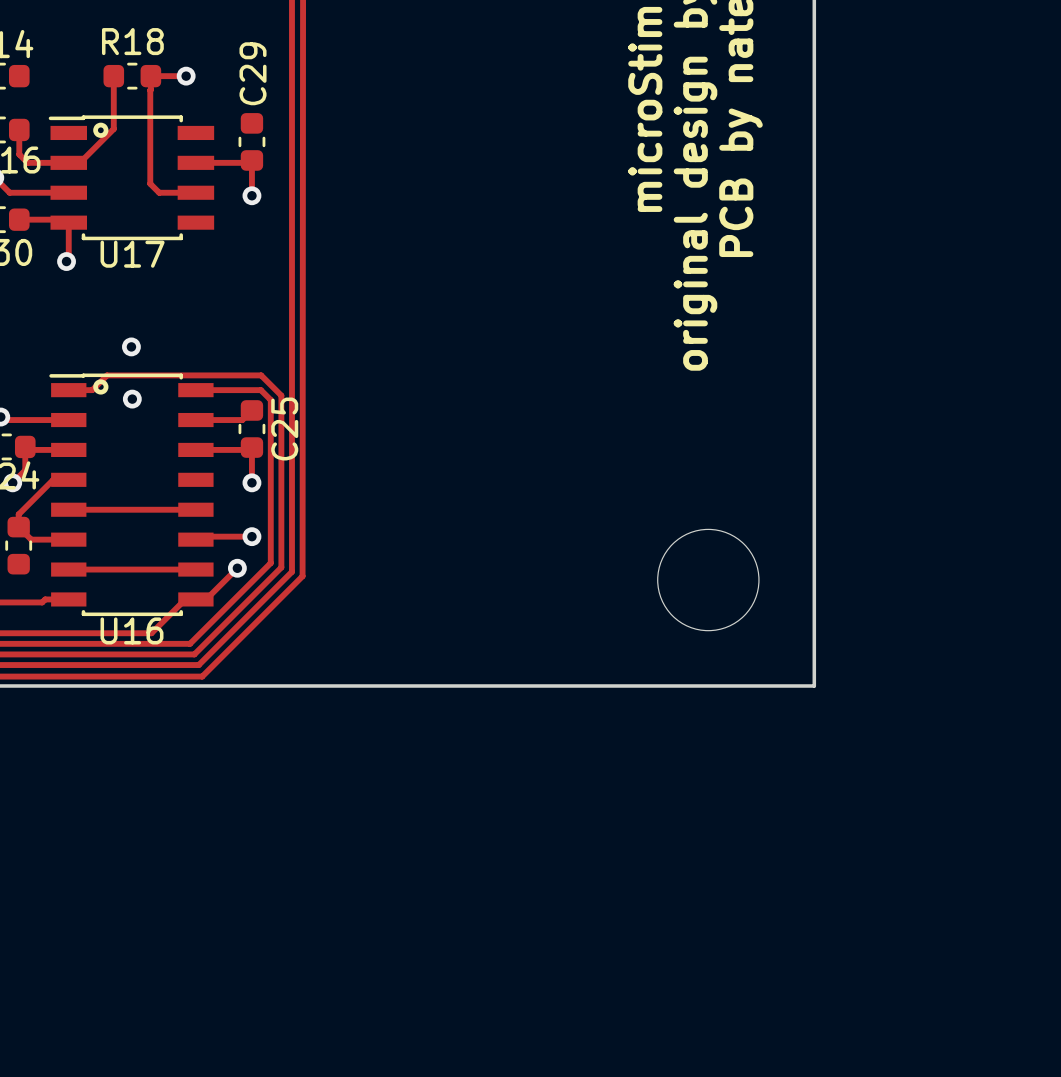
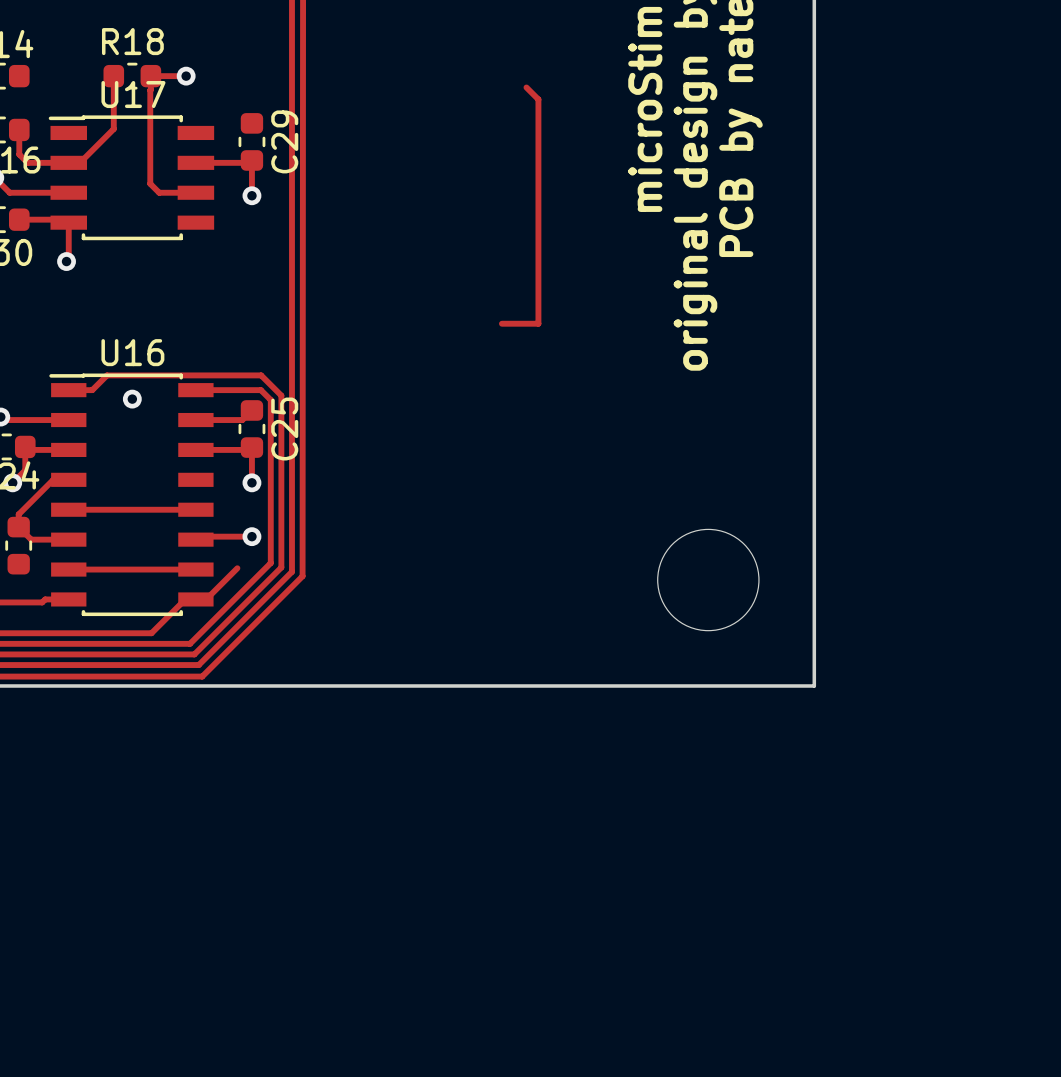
C29 name position: C29 (253, 73) -> C29 (284, 141)
track: none -> (526, 87) (538, 99) (538, 323) (501, 323)
drawing: [93, 122, 109, 138] -> none
U17 name position: U17 (132, 254) -> U17 (133, 94)
via: (131, 346) -> none
drawing: [93, 379, 109, 395] -> none
via: (237, 568) -> none
U16 name position: U16 (132, 630) -> U16 (132, 352)

